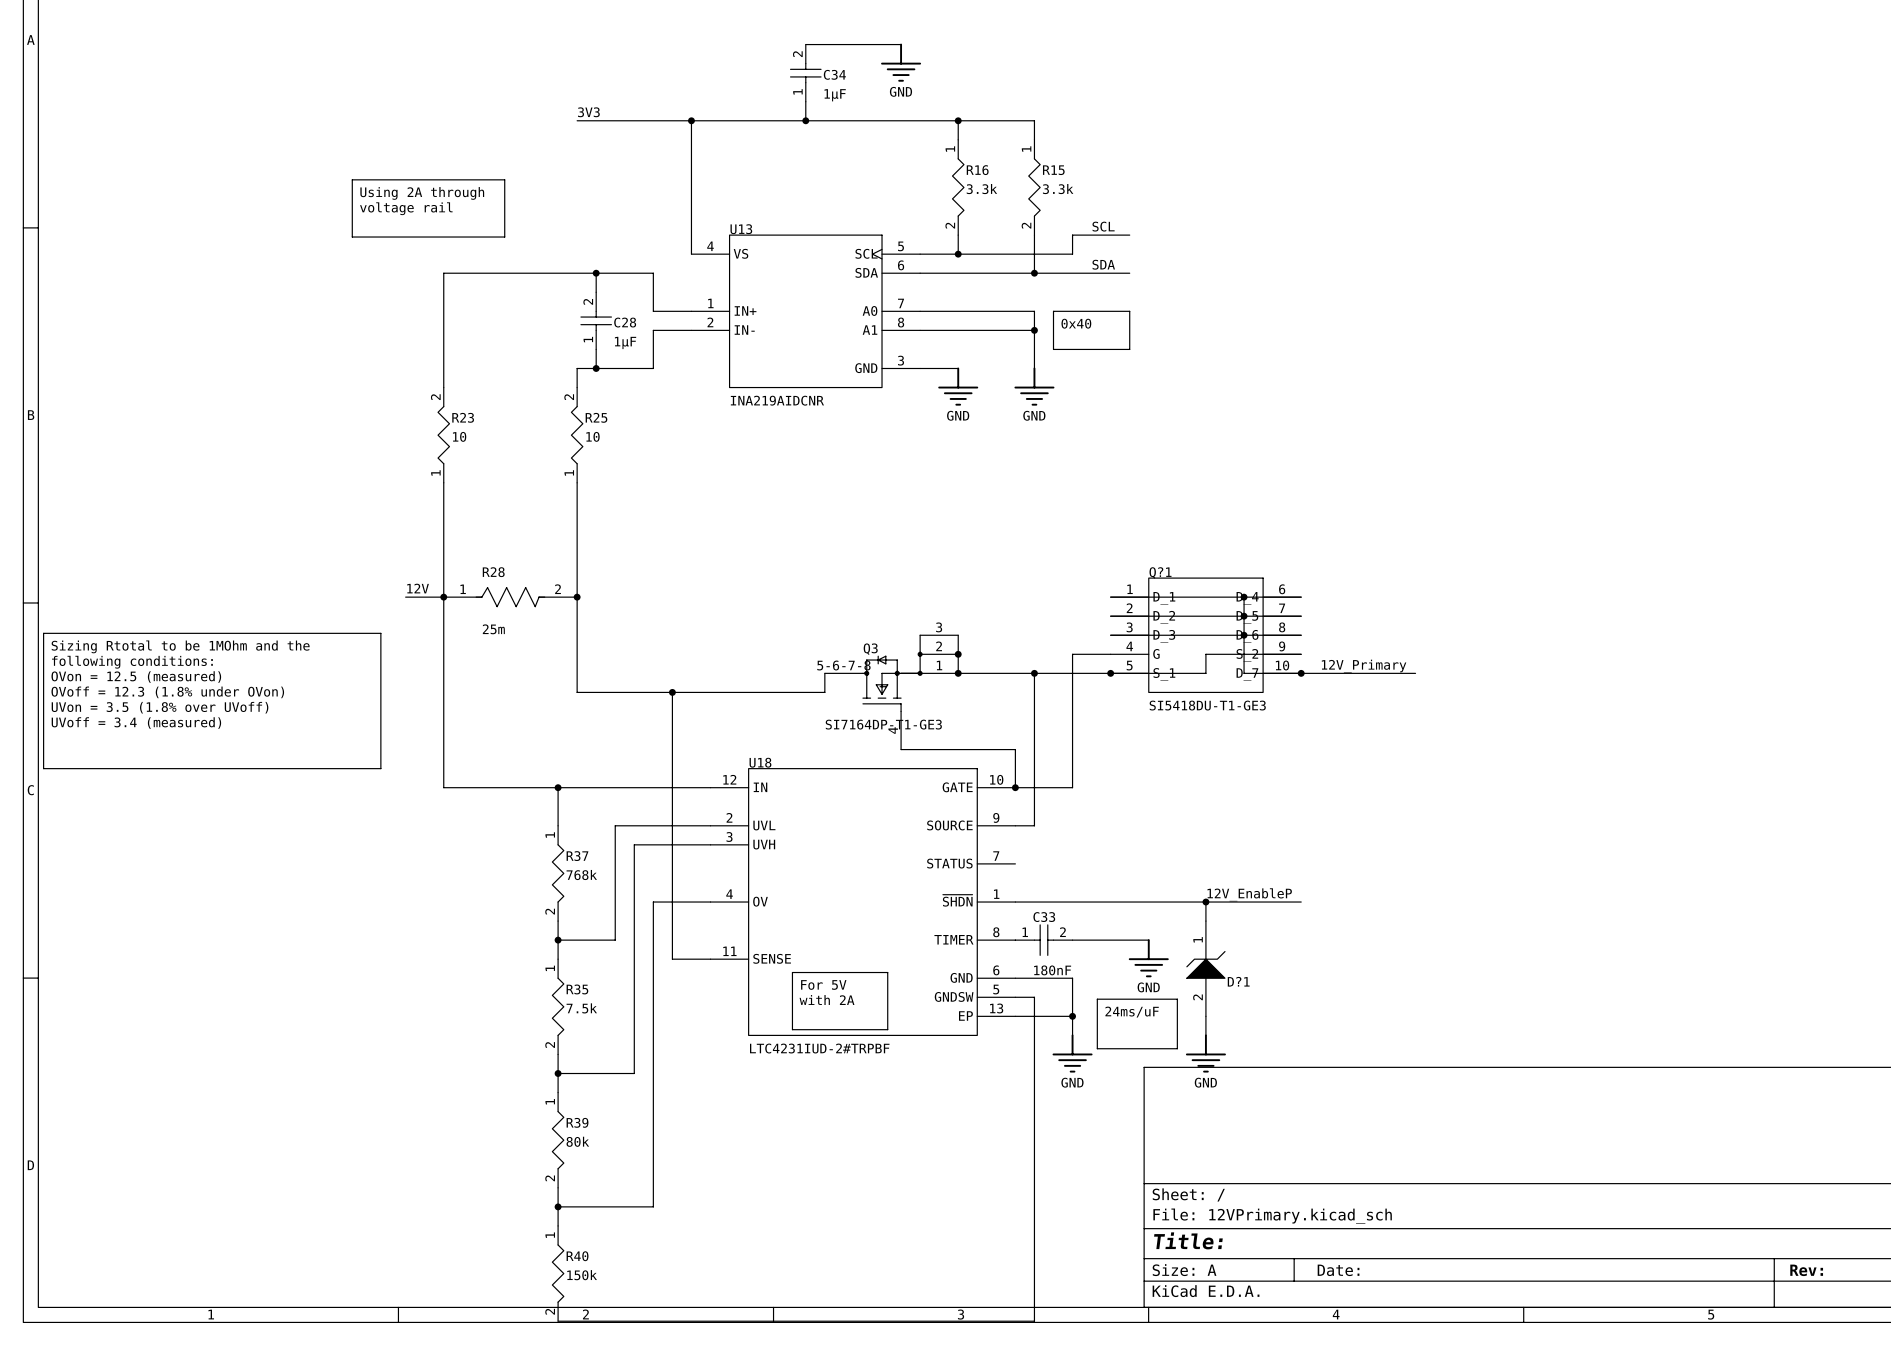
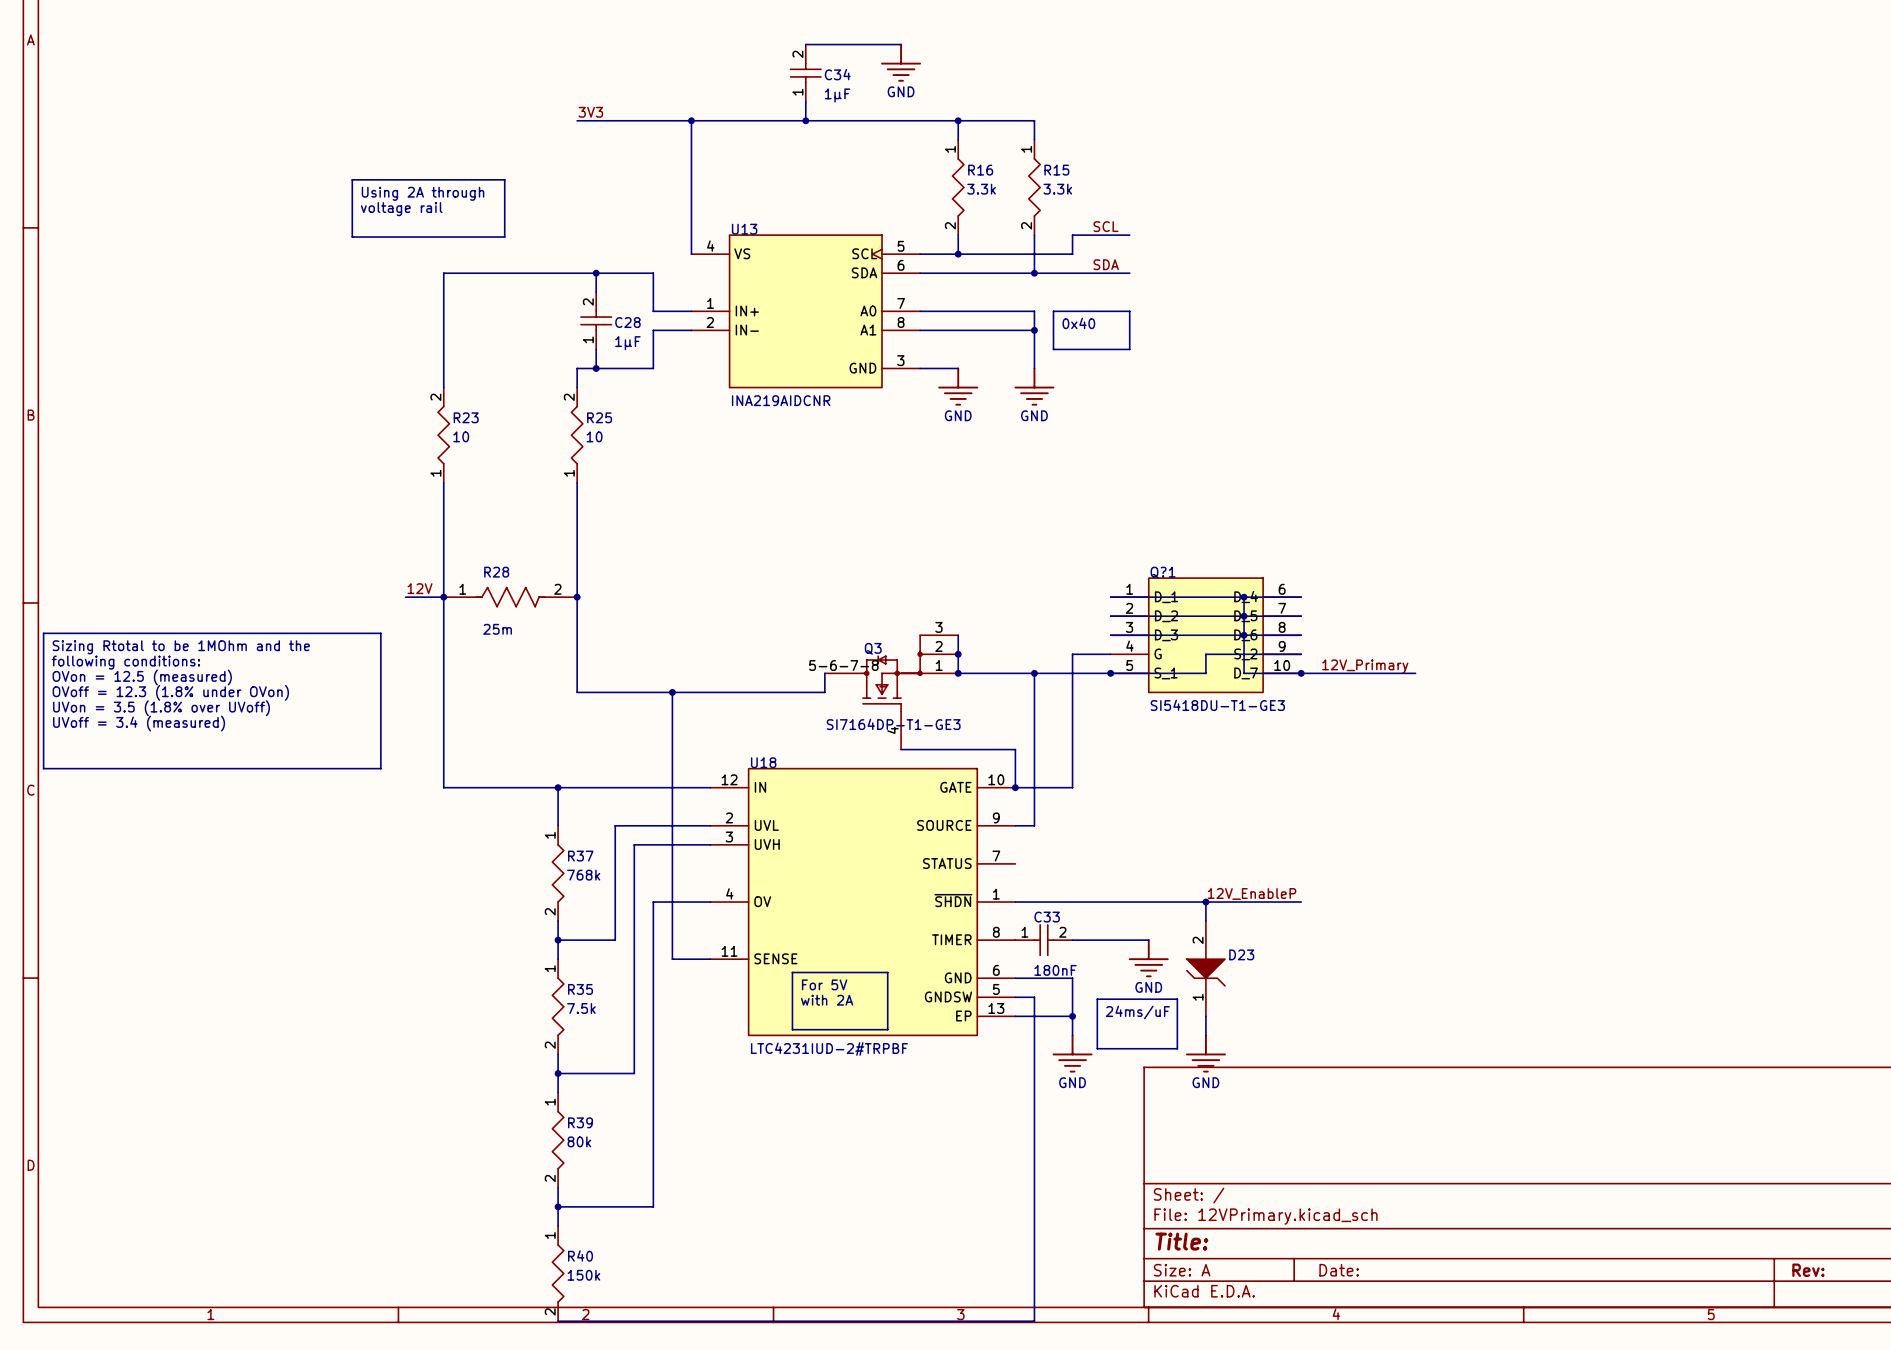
D?1: (1205, 968) -> none
D23: none -> (1205, 968)

